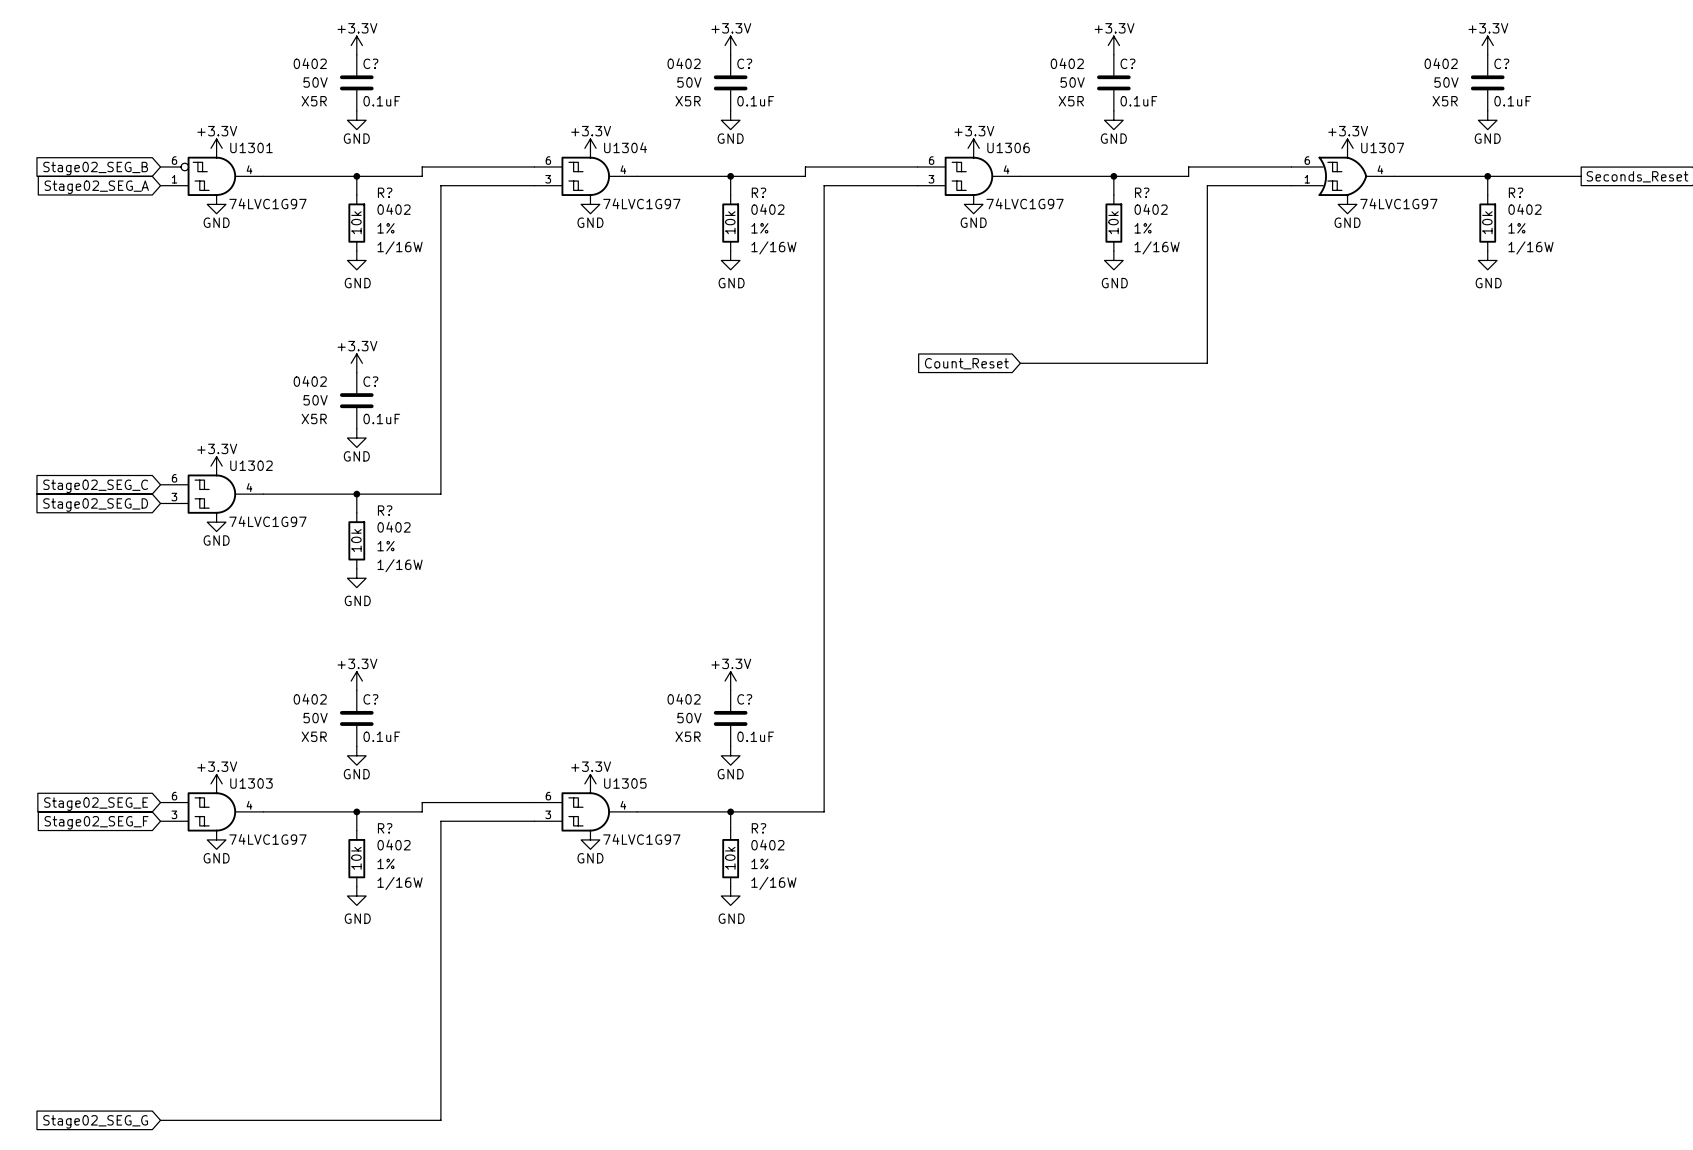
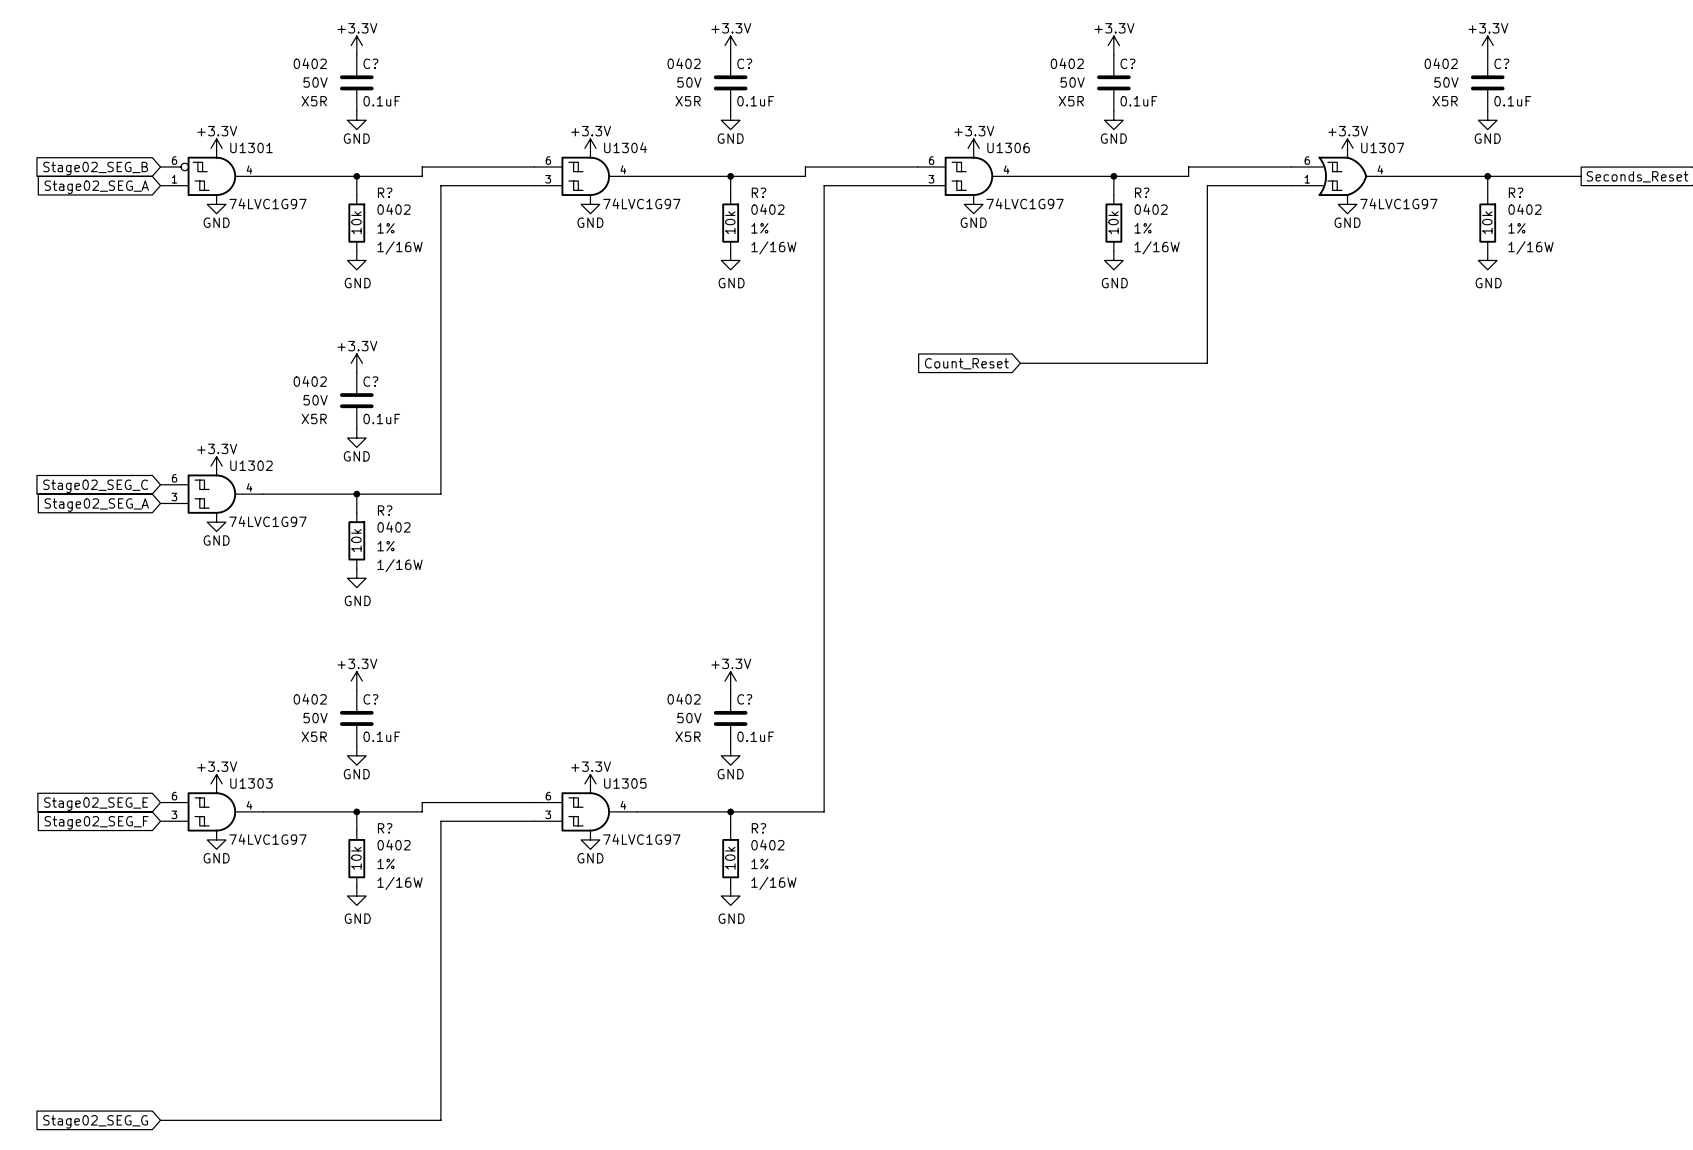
global label: Stage02_SEG_D (95, 505) -> Stage02_SEG_A (96, 505)

